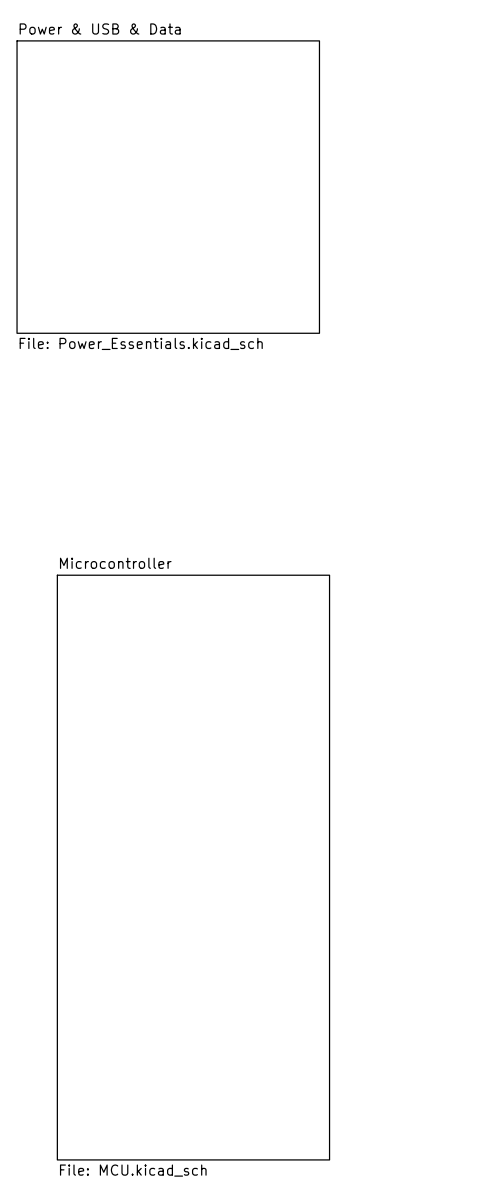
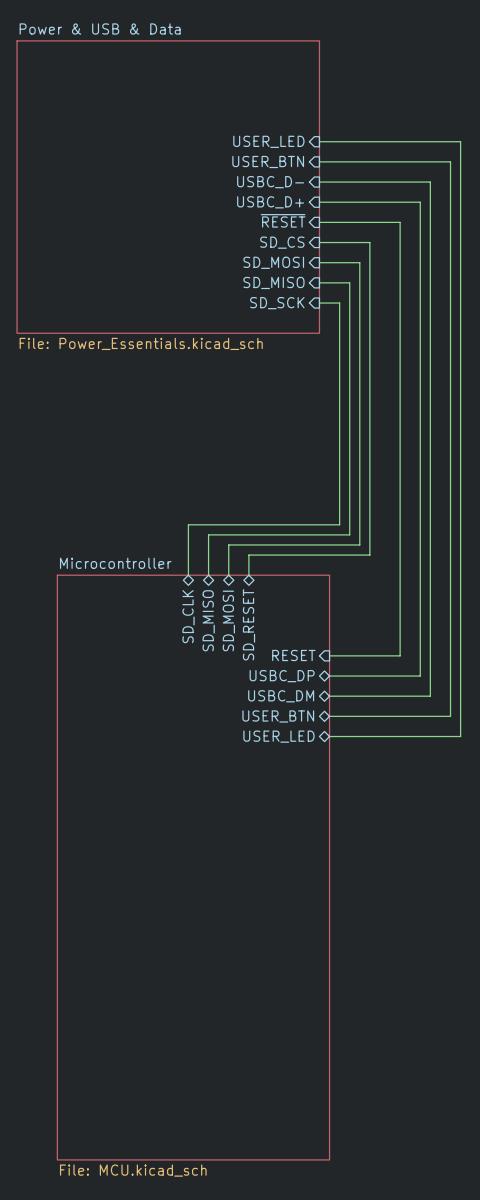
sheet pin: none -> USER_LED (268, 141)
wire: none -> (319, 141) (460, 141) (460, 736) (329, 736)
sheet pin: none -> USER_BTN (268, 161)
wire: none -> (319, 161) (450, 161) (450, 716) (329, 716)
sheet pin: none -> USBC_D- (270, 182)
wire: none -> (319, 182) (430, 182) (430, 696) (329, 696)
sheet pin: none -> USBC_D+ (270, 202)
wire: none -> (319, 202) (420, 202) (420, 676) (329, 676)
sheet pin: none -> ~{RESET} (283, 220)
wire: none -> (319, 222) (400, 222) (400, 655) (329, 655)
sheet pin: none -> SD_CS (282, 242)
wire: none -> (319, 242) (369, 242) (369, 555) (248, 555) (248, 575)
sheet pin: none -> SD_MOSI (273, 262)
wire: none -> (319, 262) (359, 262) (359, 544) (228, 544) (228, 575)
sheet pin: none -> SD_MISO (273, 282)
wire: none -> (319, 282) (349, 282) (349, 534) (208, 534) (208, 575)
sheet pin: none -> SD_SCK (277, 303)
wire: none -> (319, 303) (339, 303) (339, 524) (188, 524) (188, 575)
sheet pin: none -> SD_CLK (188, 616)
sheet pin: none -> SD_MISO (208, 620)
sheet pin: none -> SD_MOSI (228, 620)
sheet pin: none -> SD_RESET (249, 624)
sheet pin: none -> RESET (293, 655)
sheet pin: none -> USBC_DP (282, 676)
sheet pin: none -> USBC_DM (281, 696)
sheet pin: none -> USER_BTN (278, 716)
sheet pin: none -> USER_LED (278, 736)

